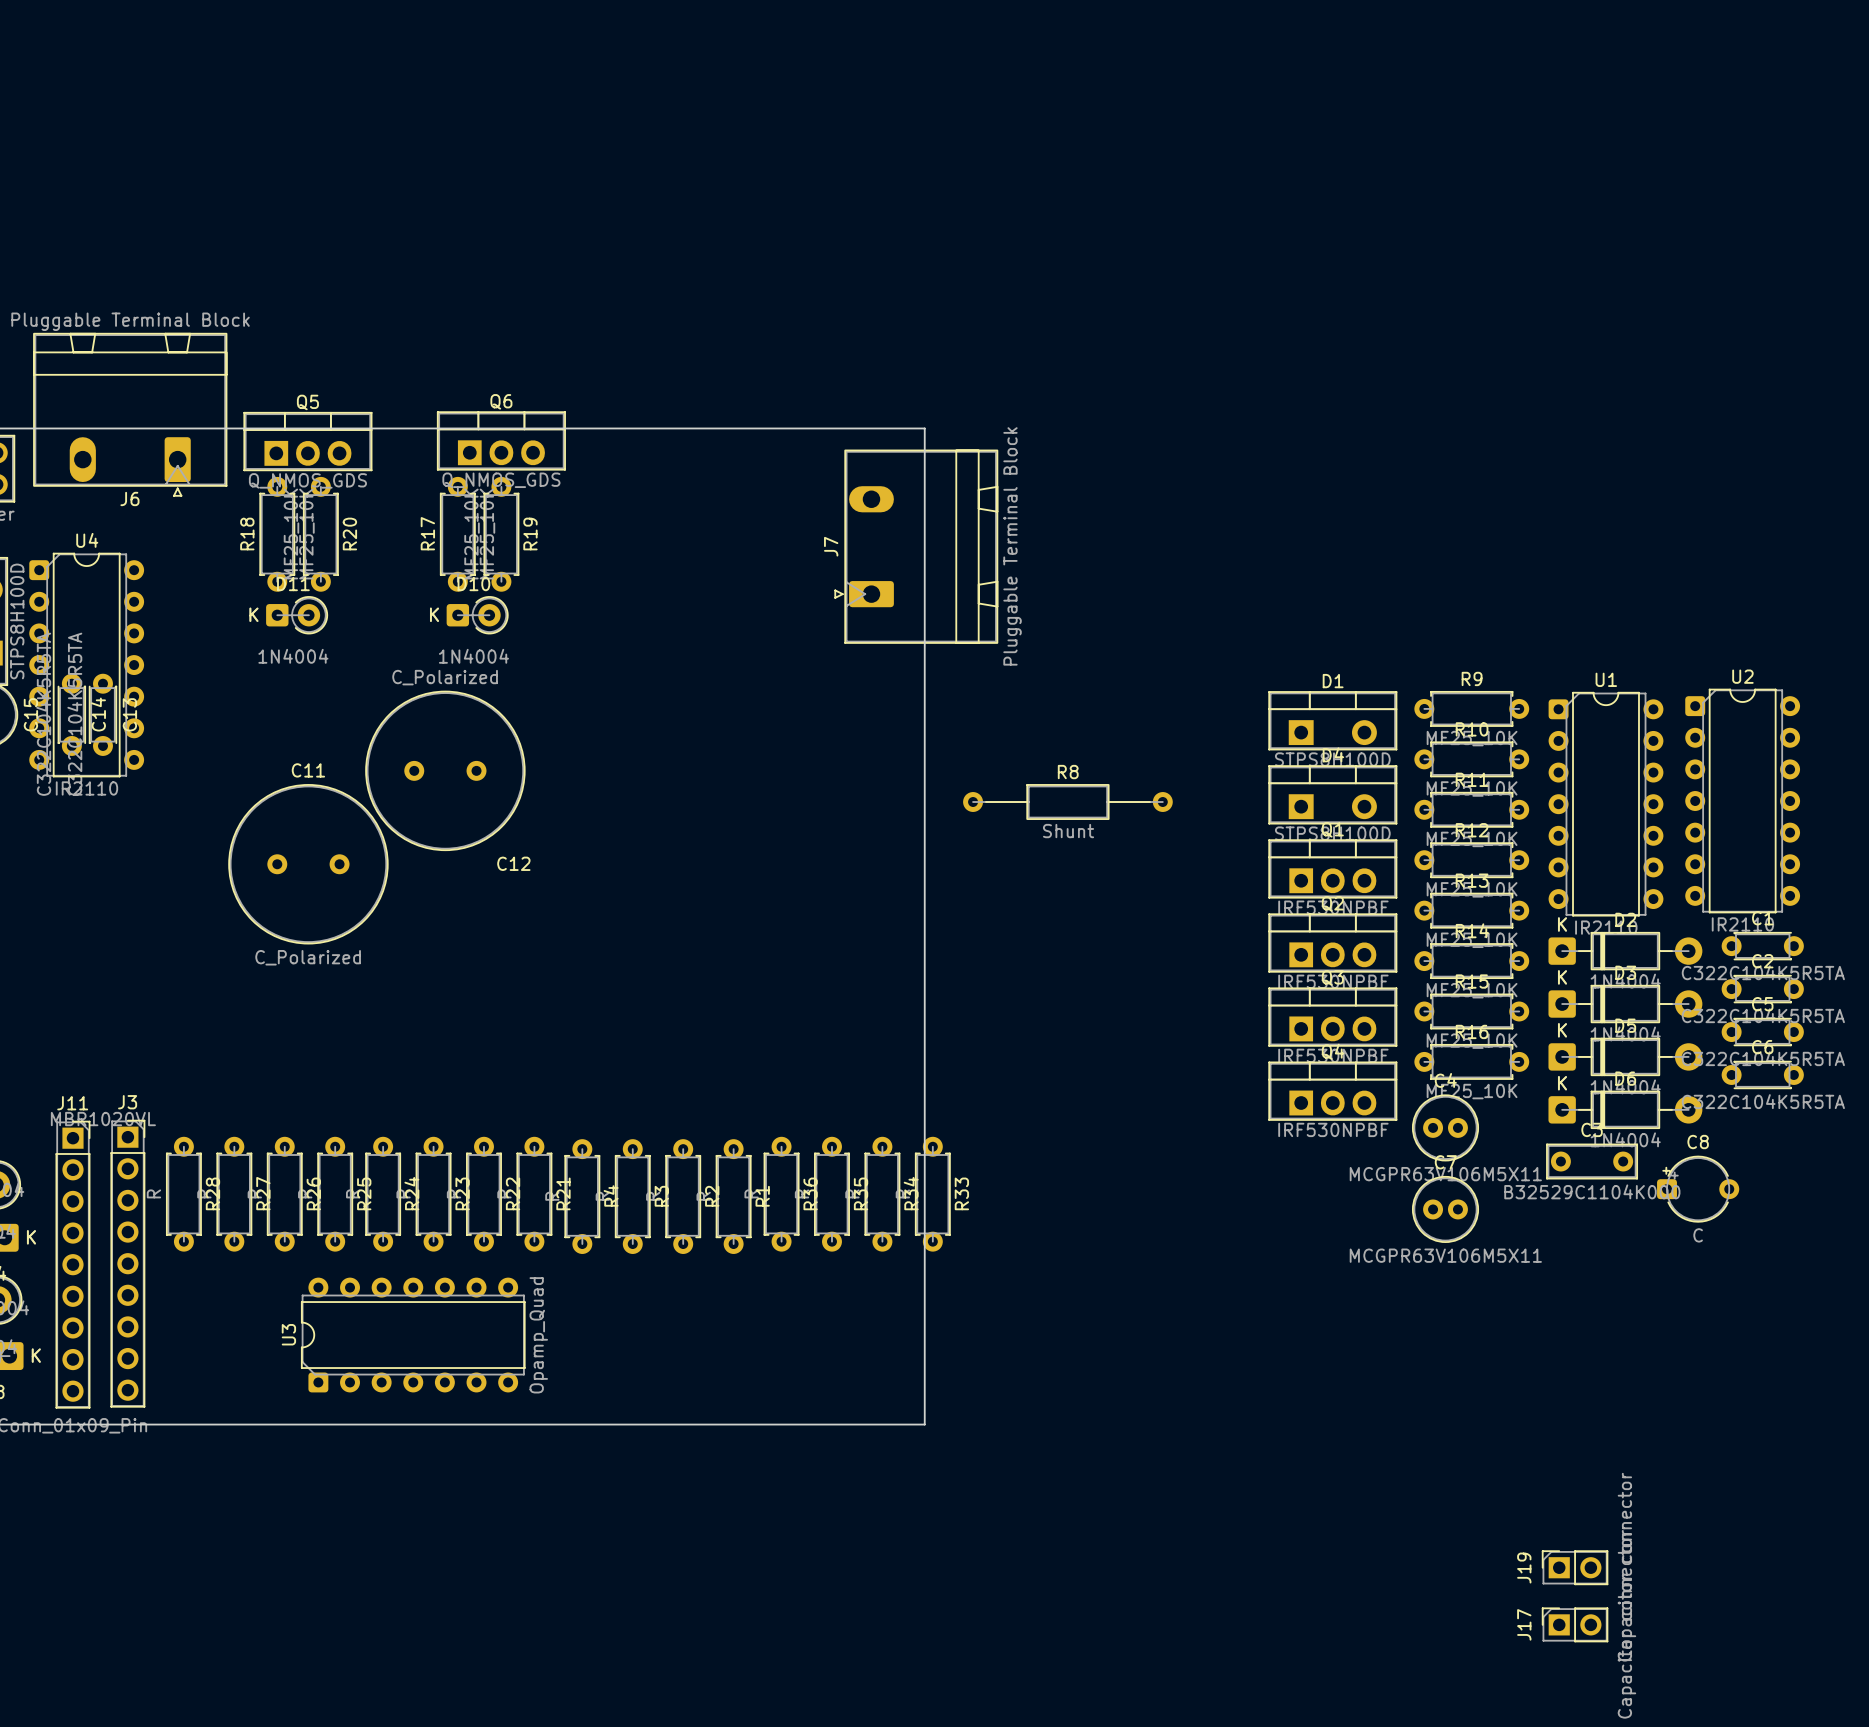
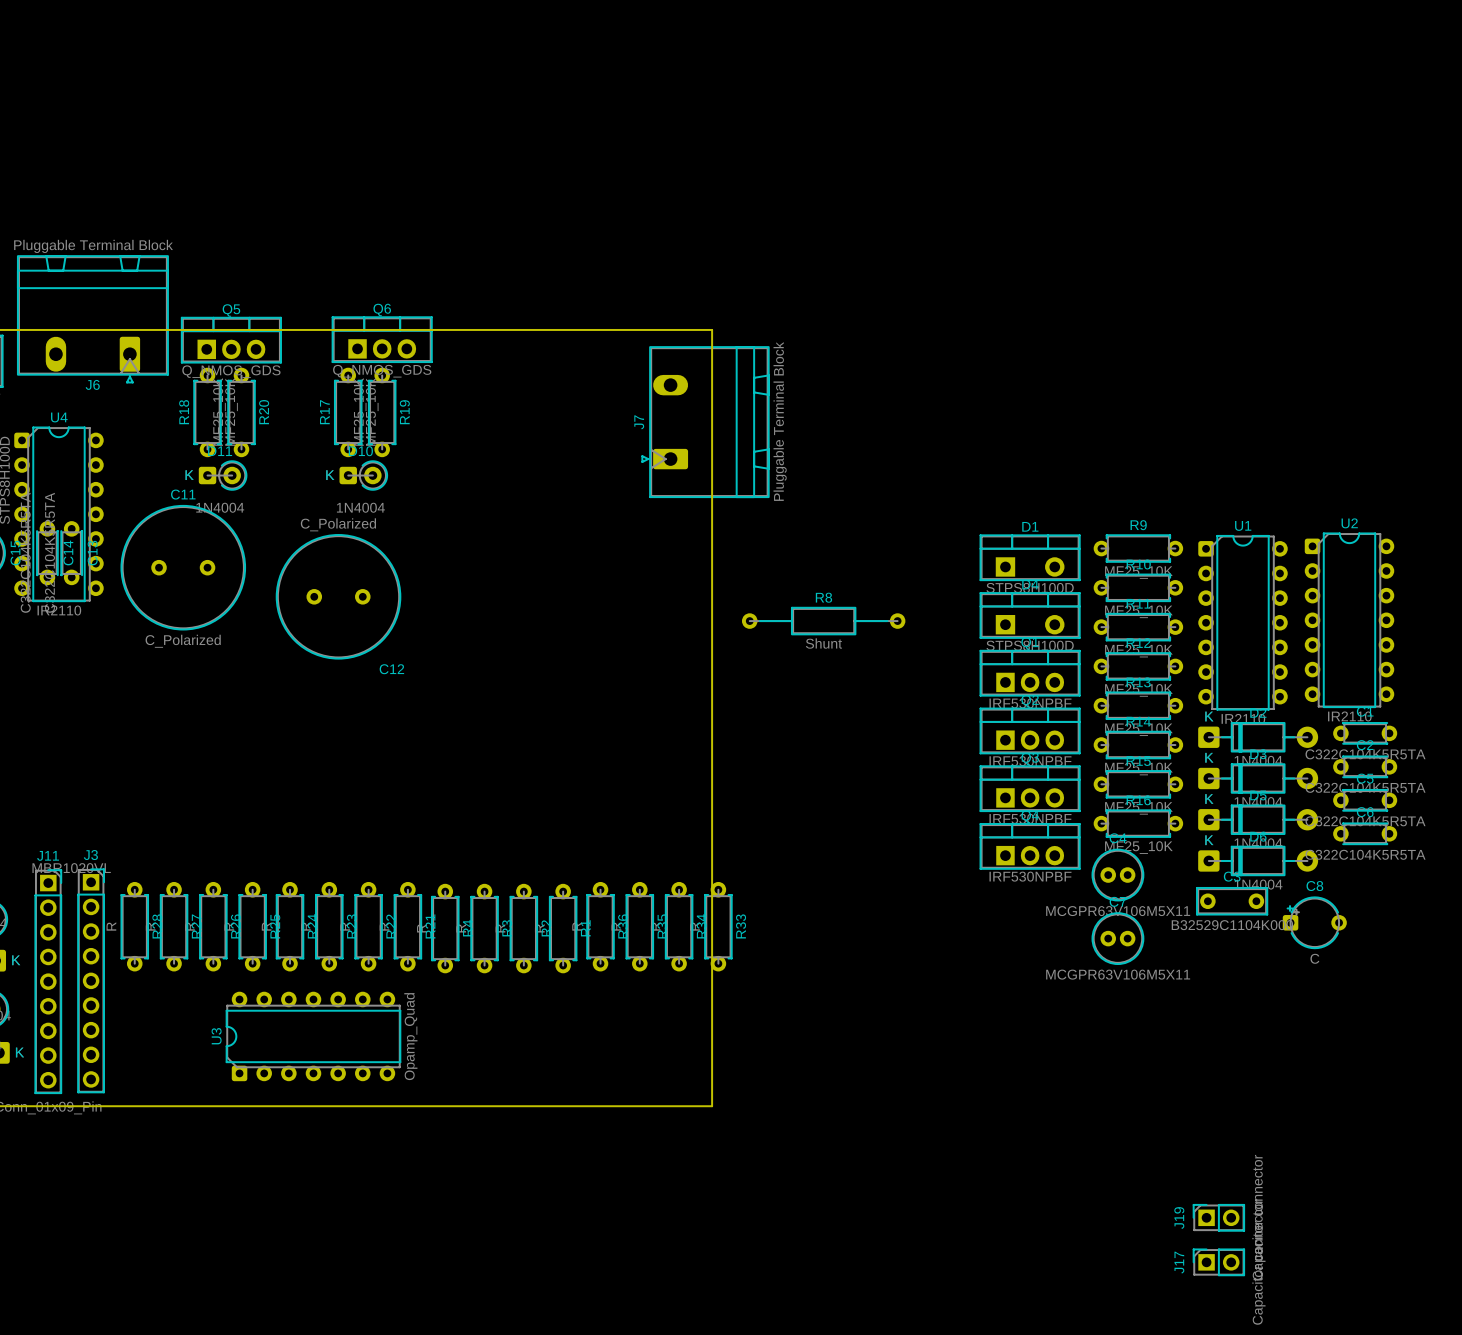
C11 position: (308, 864) -> (183, 567)

